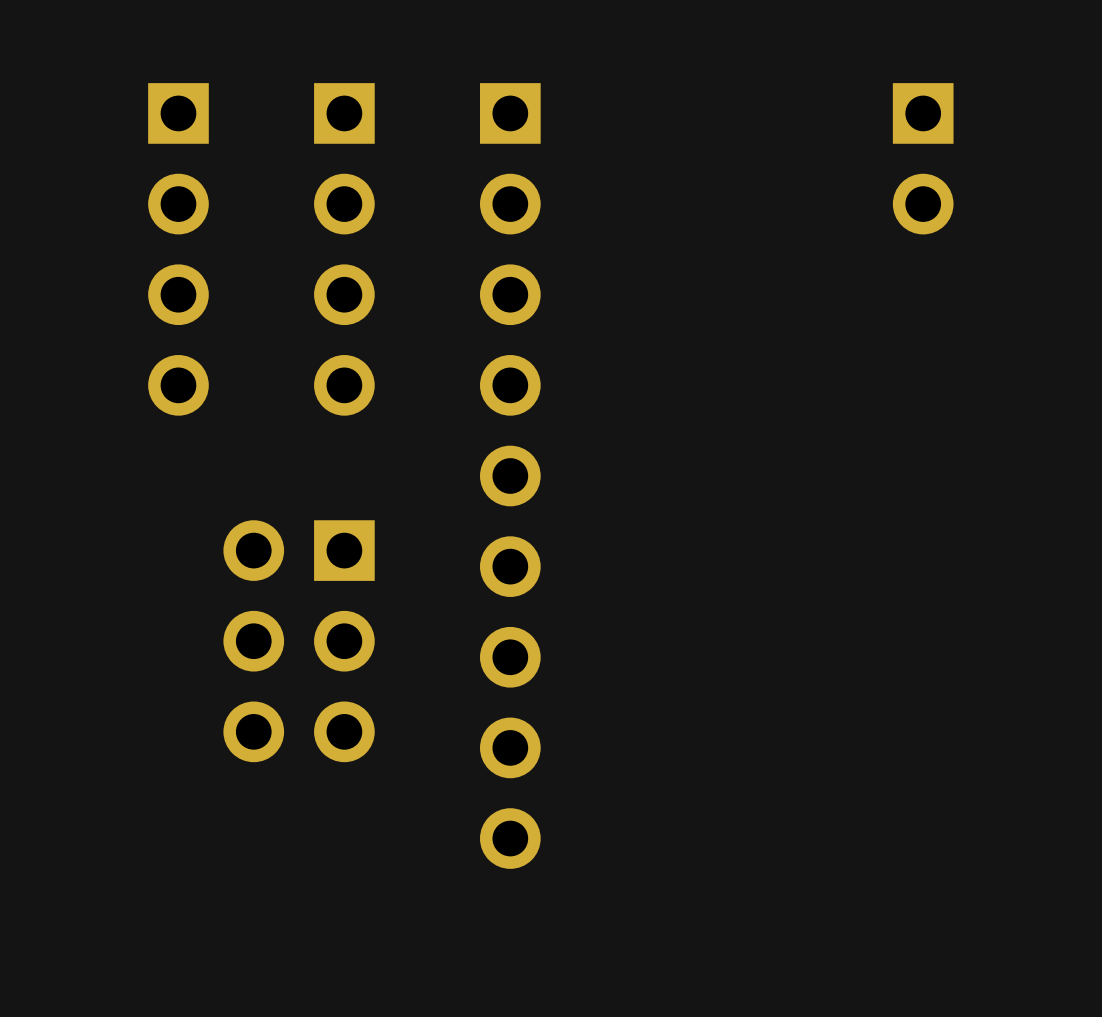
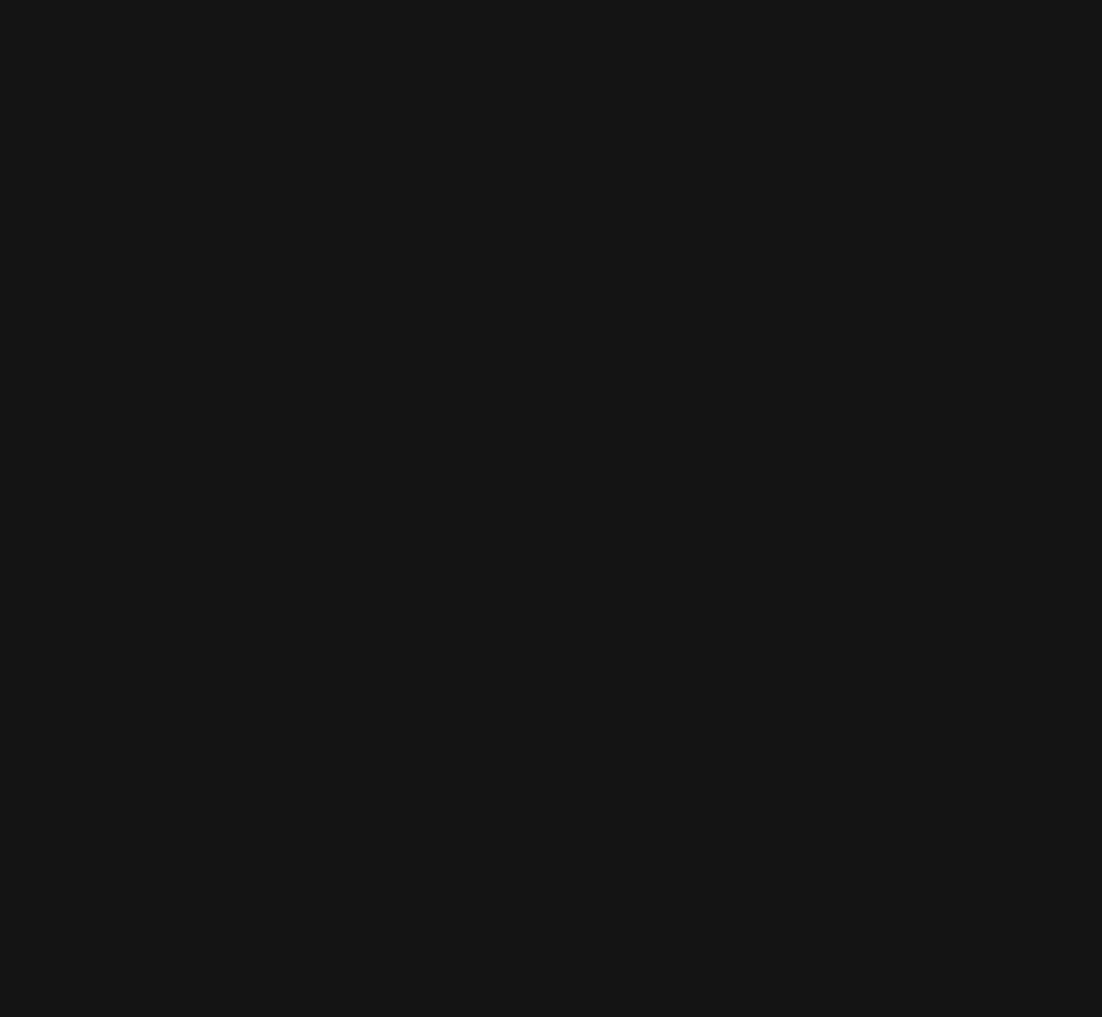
part: (923, 158) -> none
part: (178, 249) -> none
part: (344, 249) -> none
part: (510, 475) -> none
part: (299, 641) -> none

